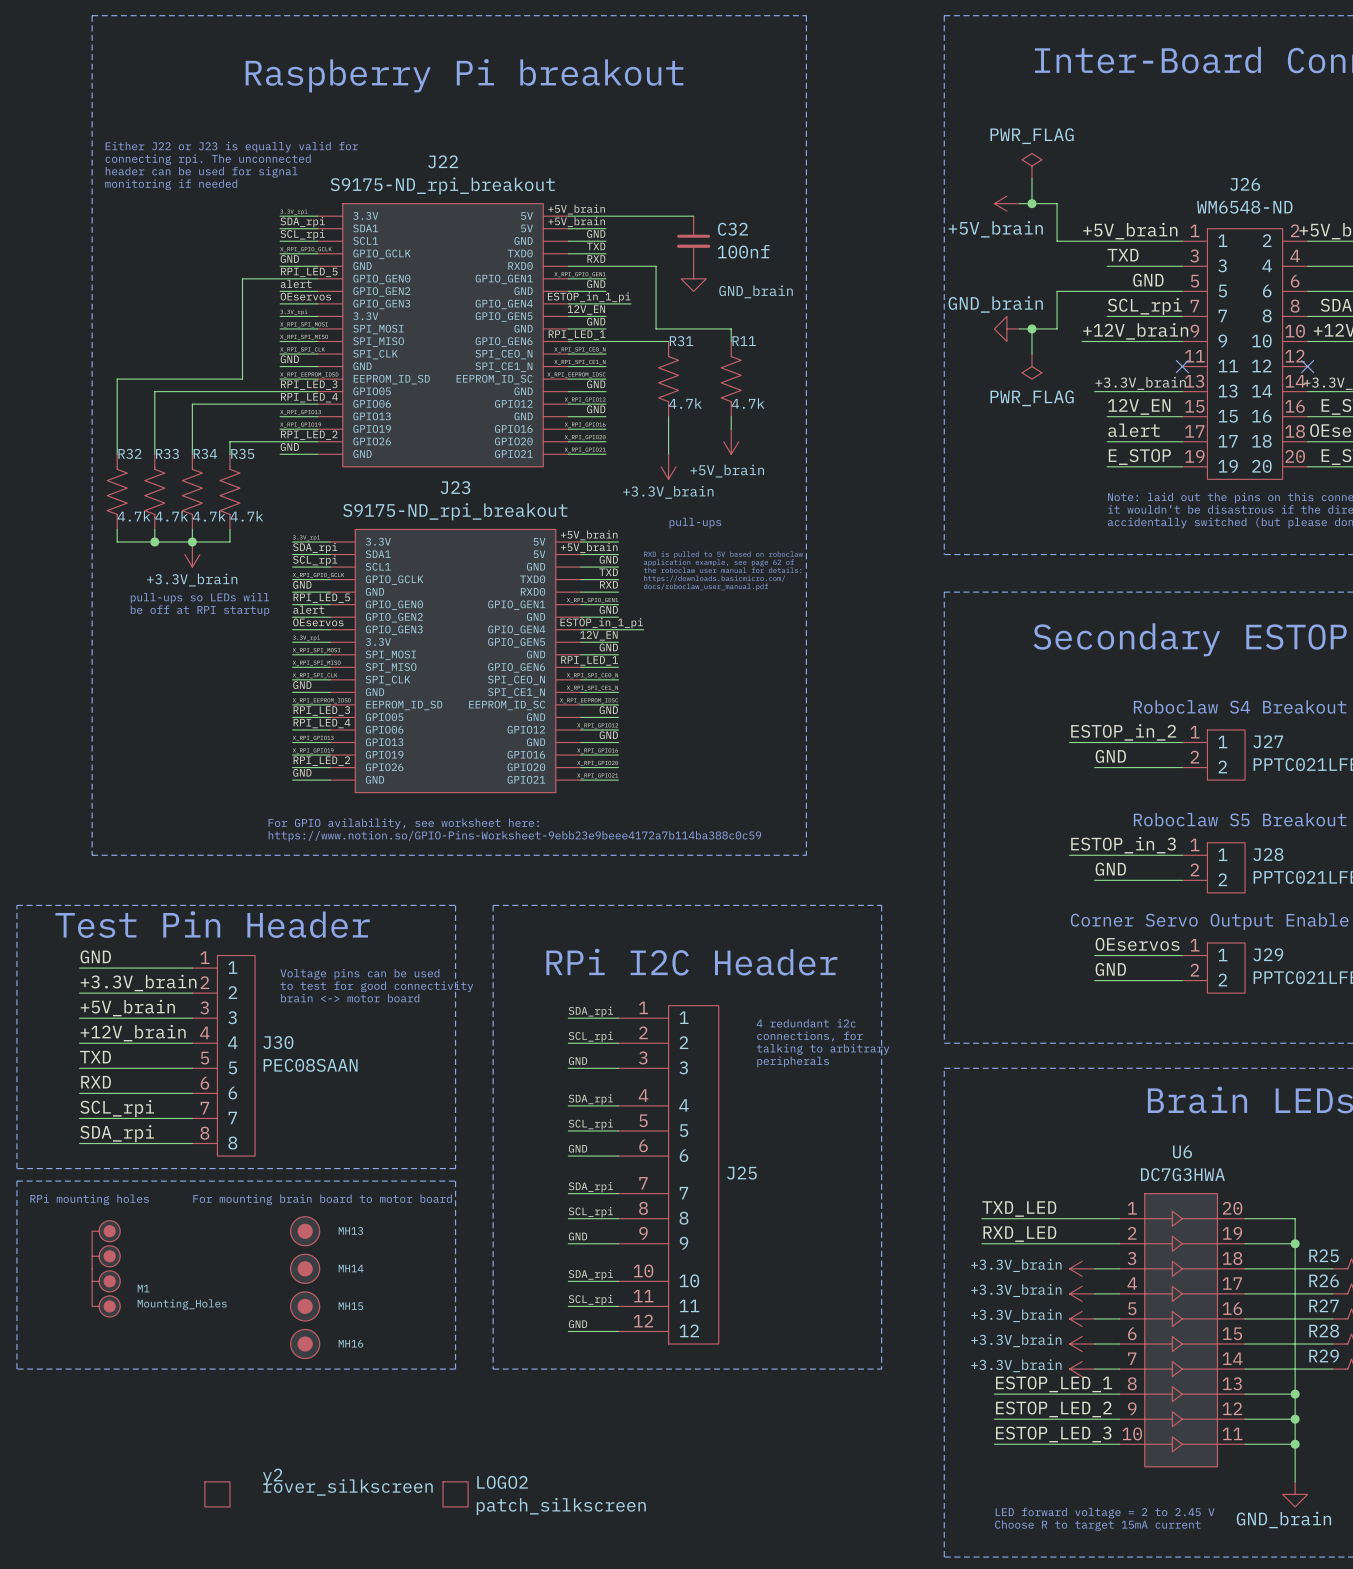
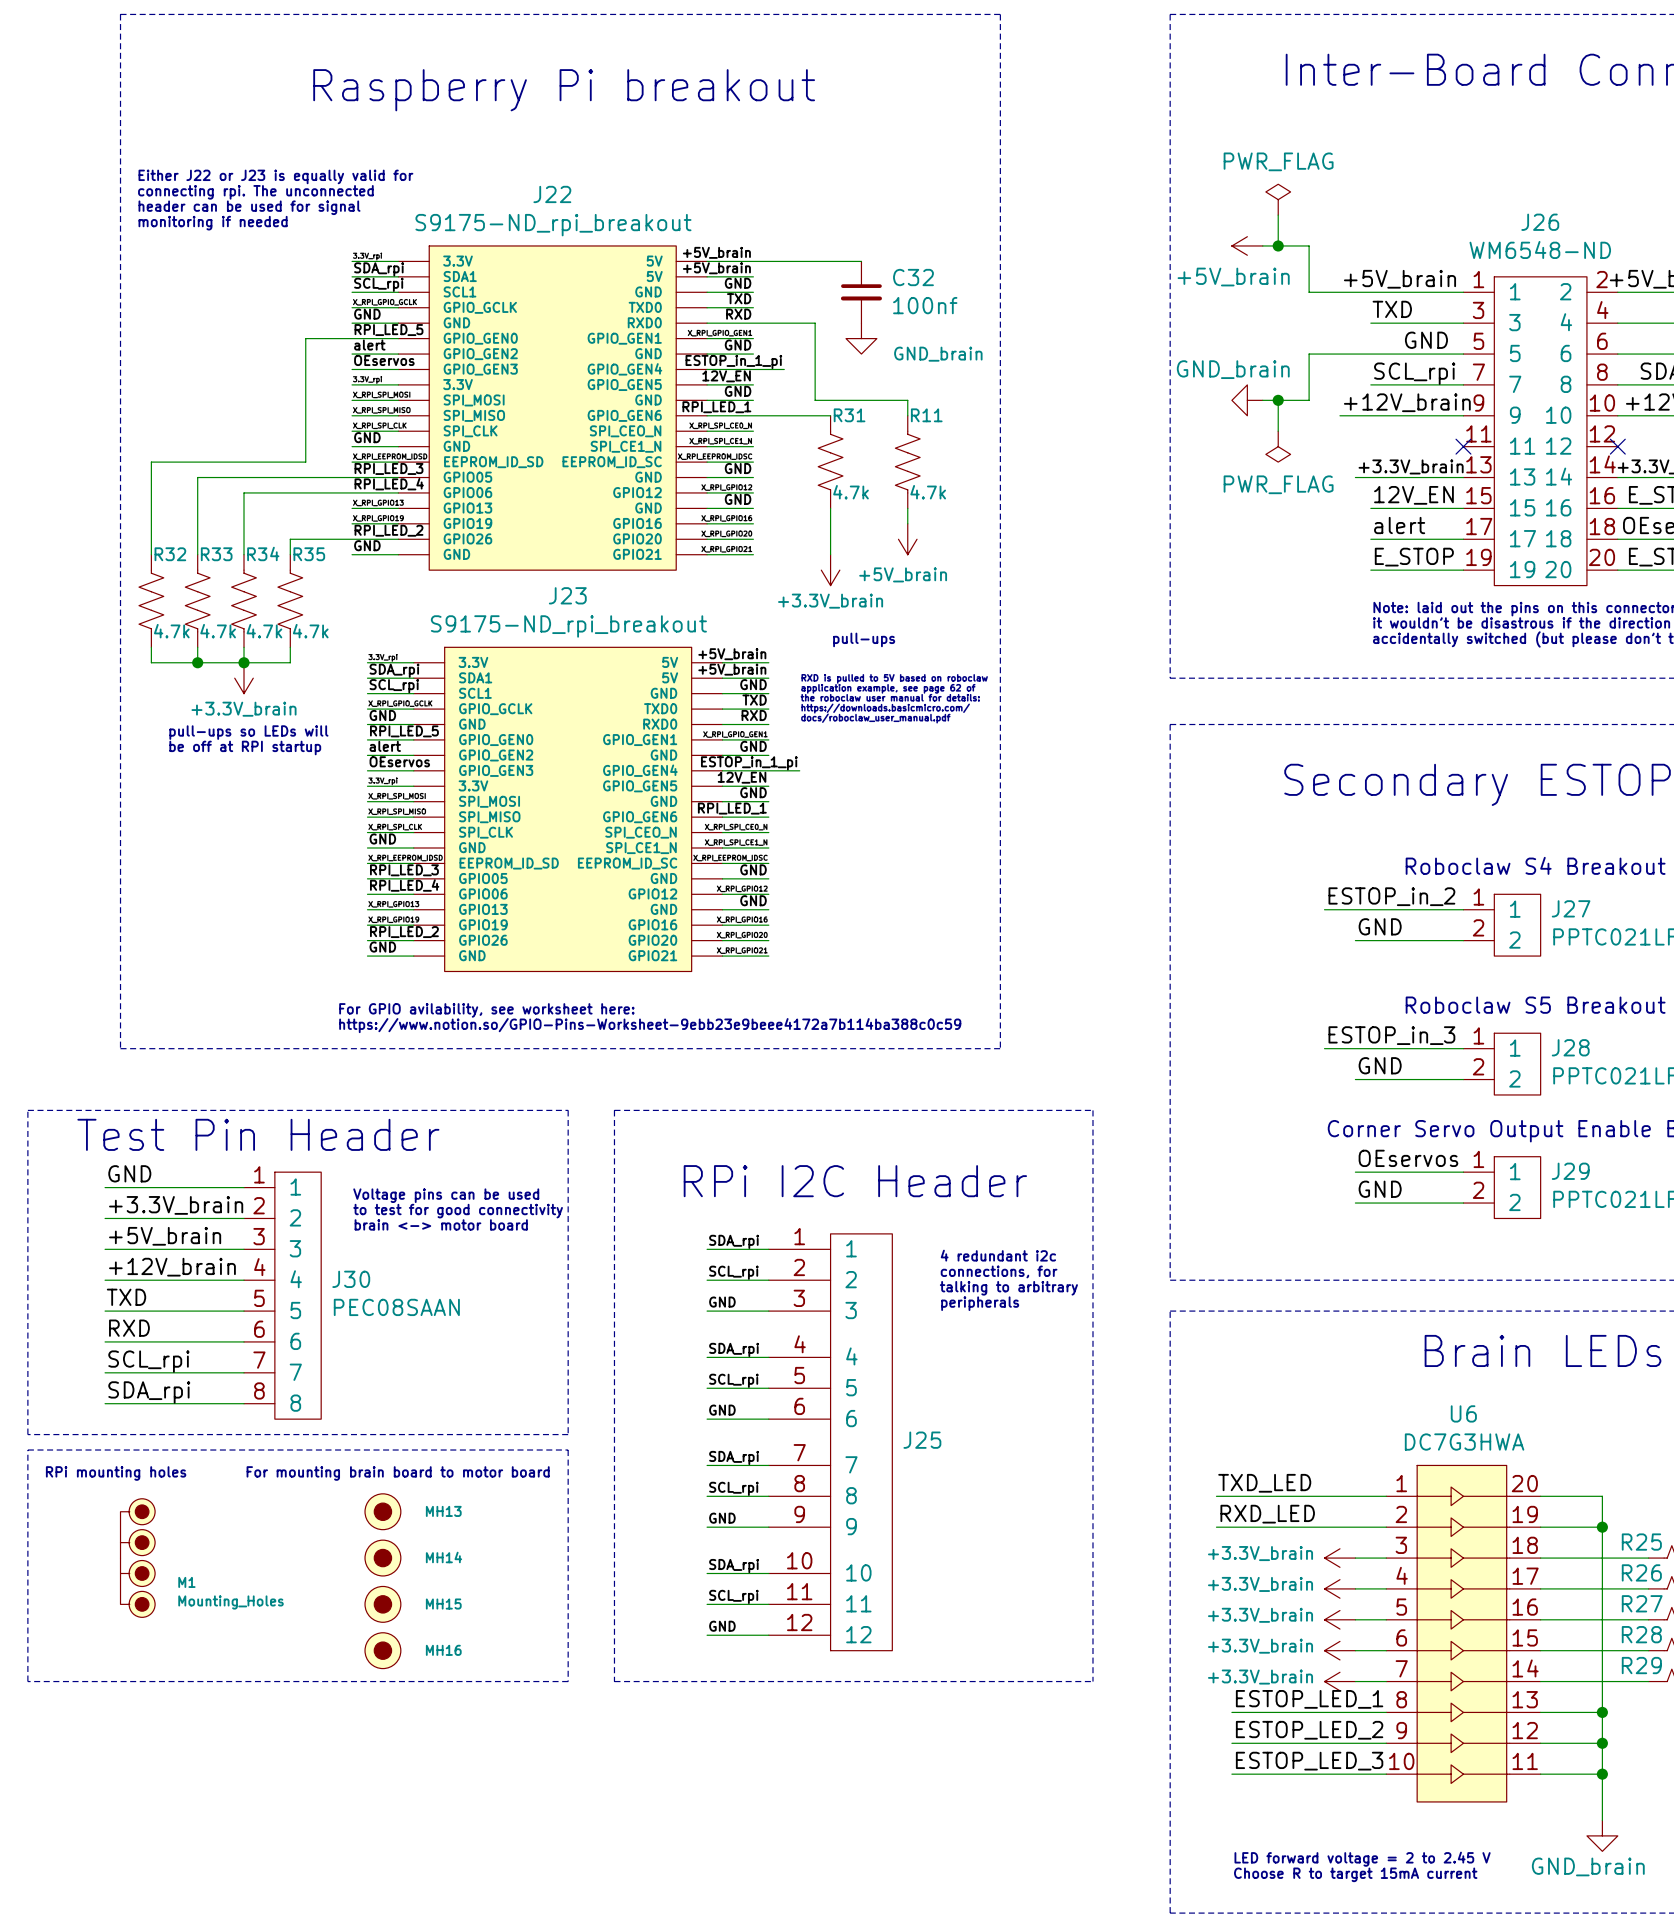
y2: rover_silkscreen (217, 1494) -> none
LOGO2: patch_silkscreen (455, 1494) -> none

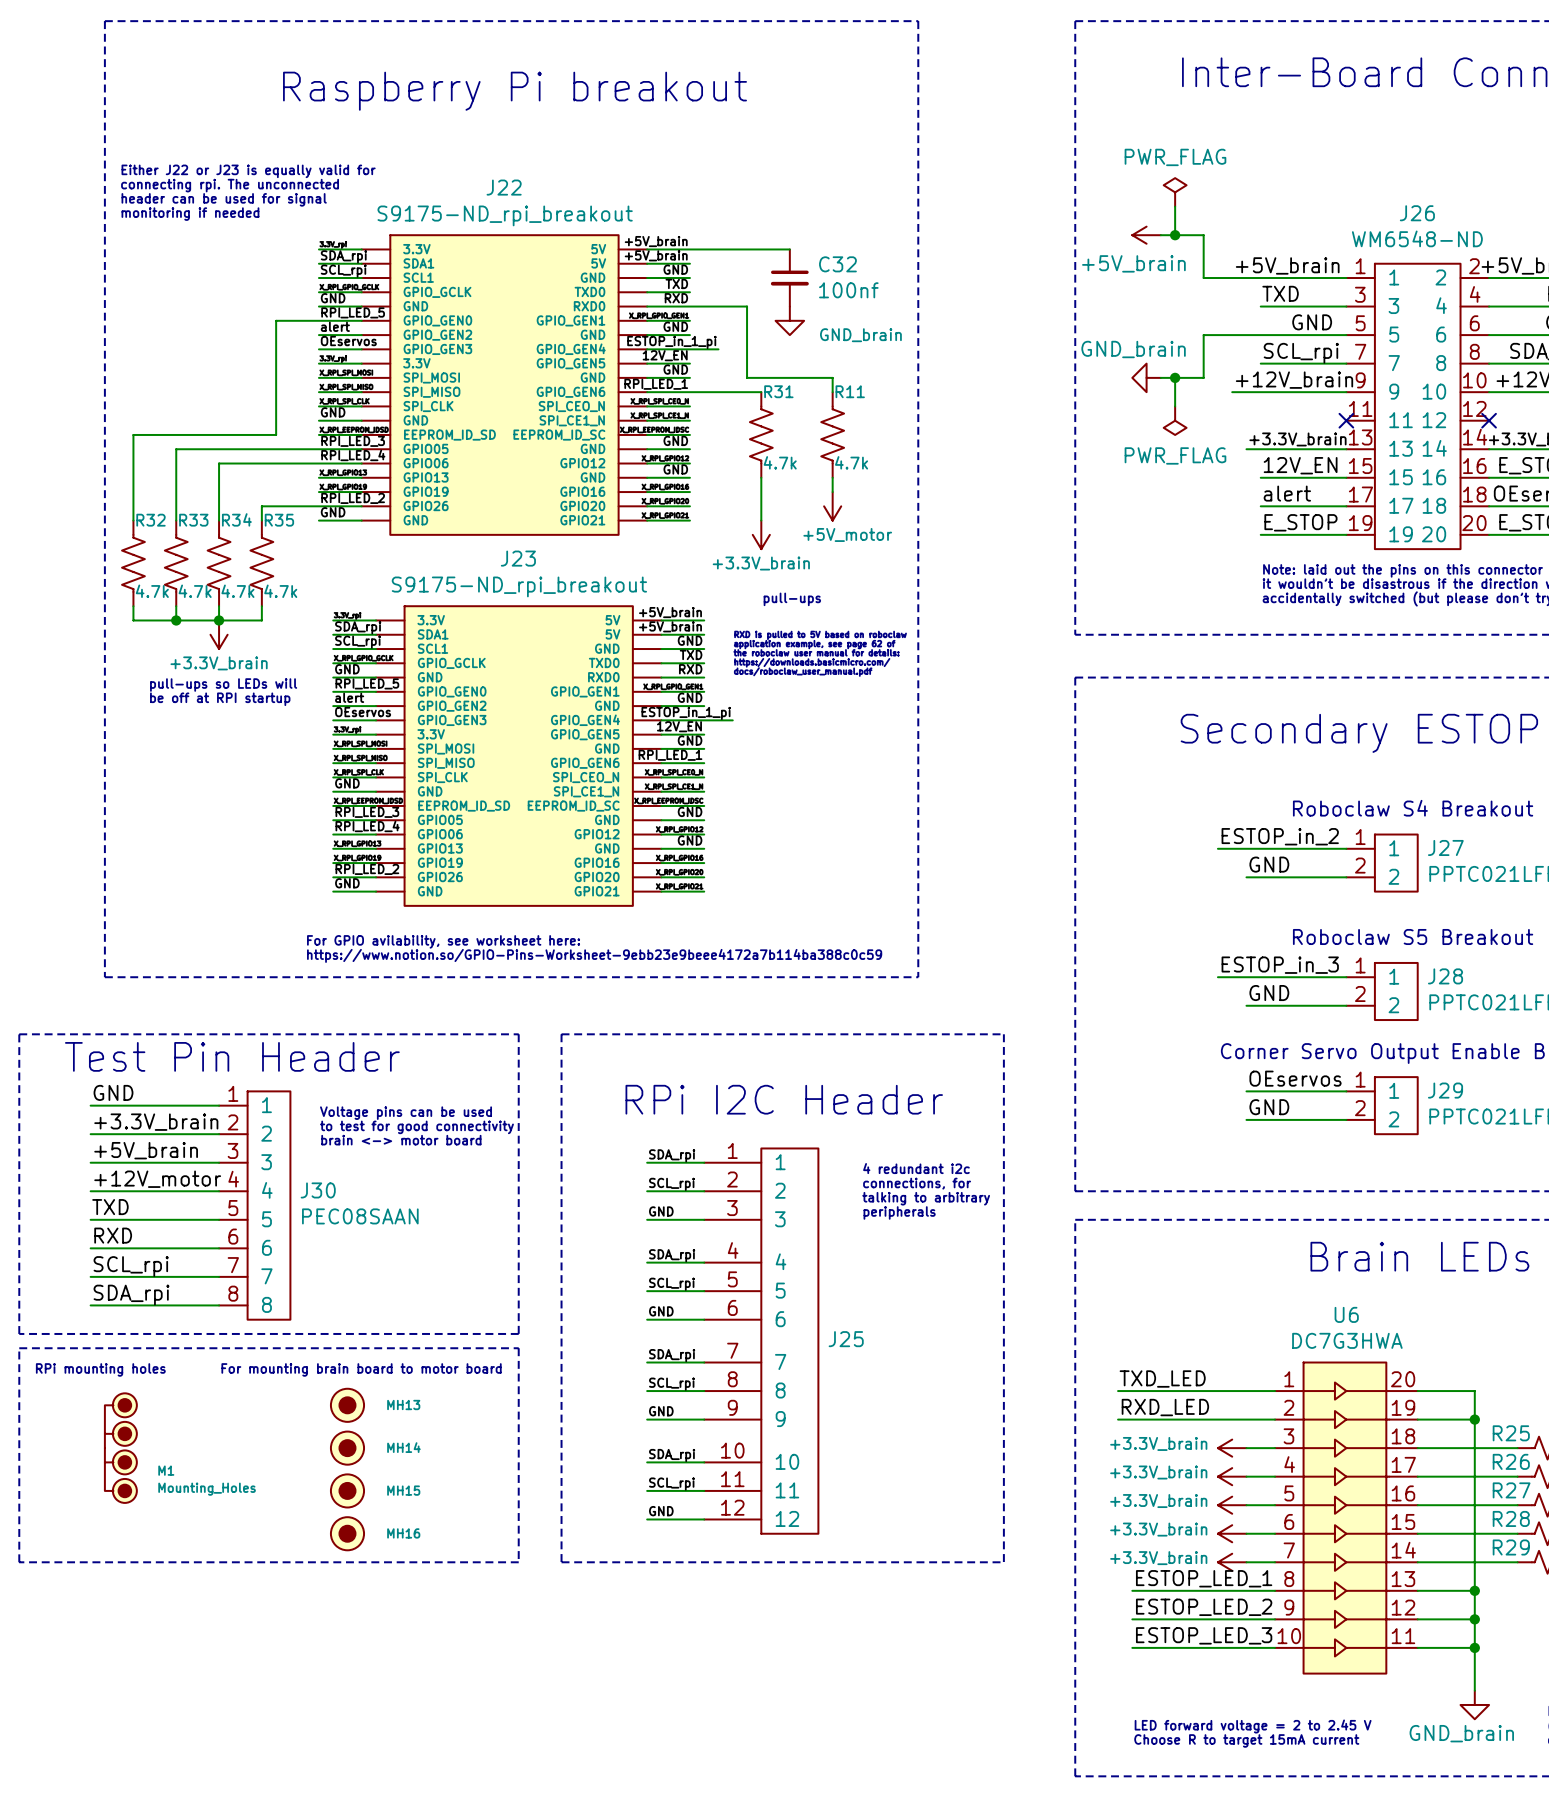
power symbol: +5V_brain (907, 539) -> +5V_motor (832, 506)
label: +12V_brain (172, 1267) -> +12V_motor (157, 1179)

